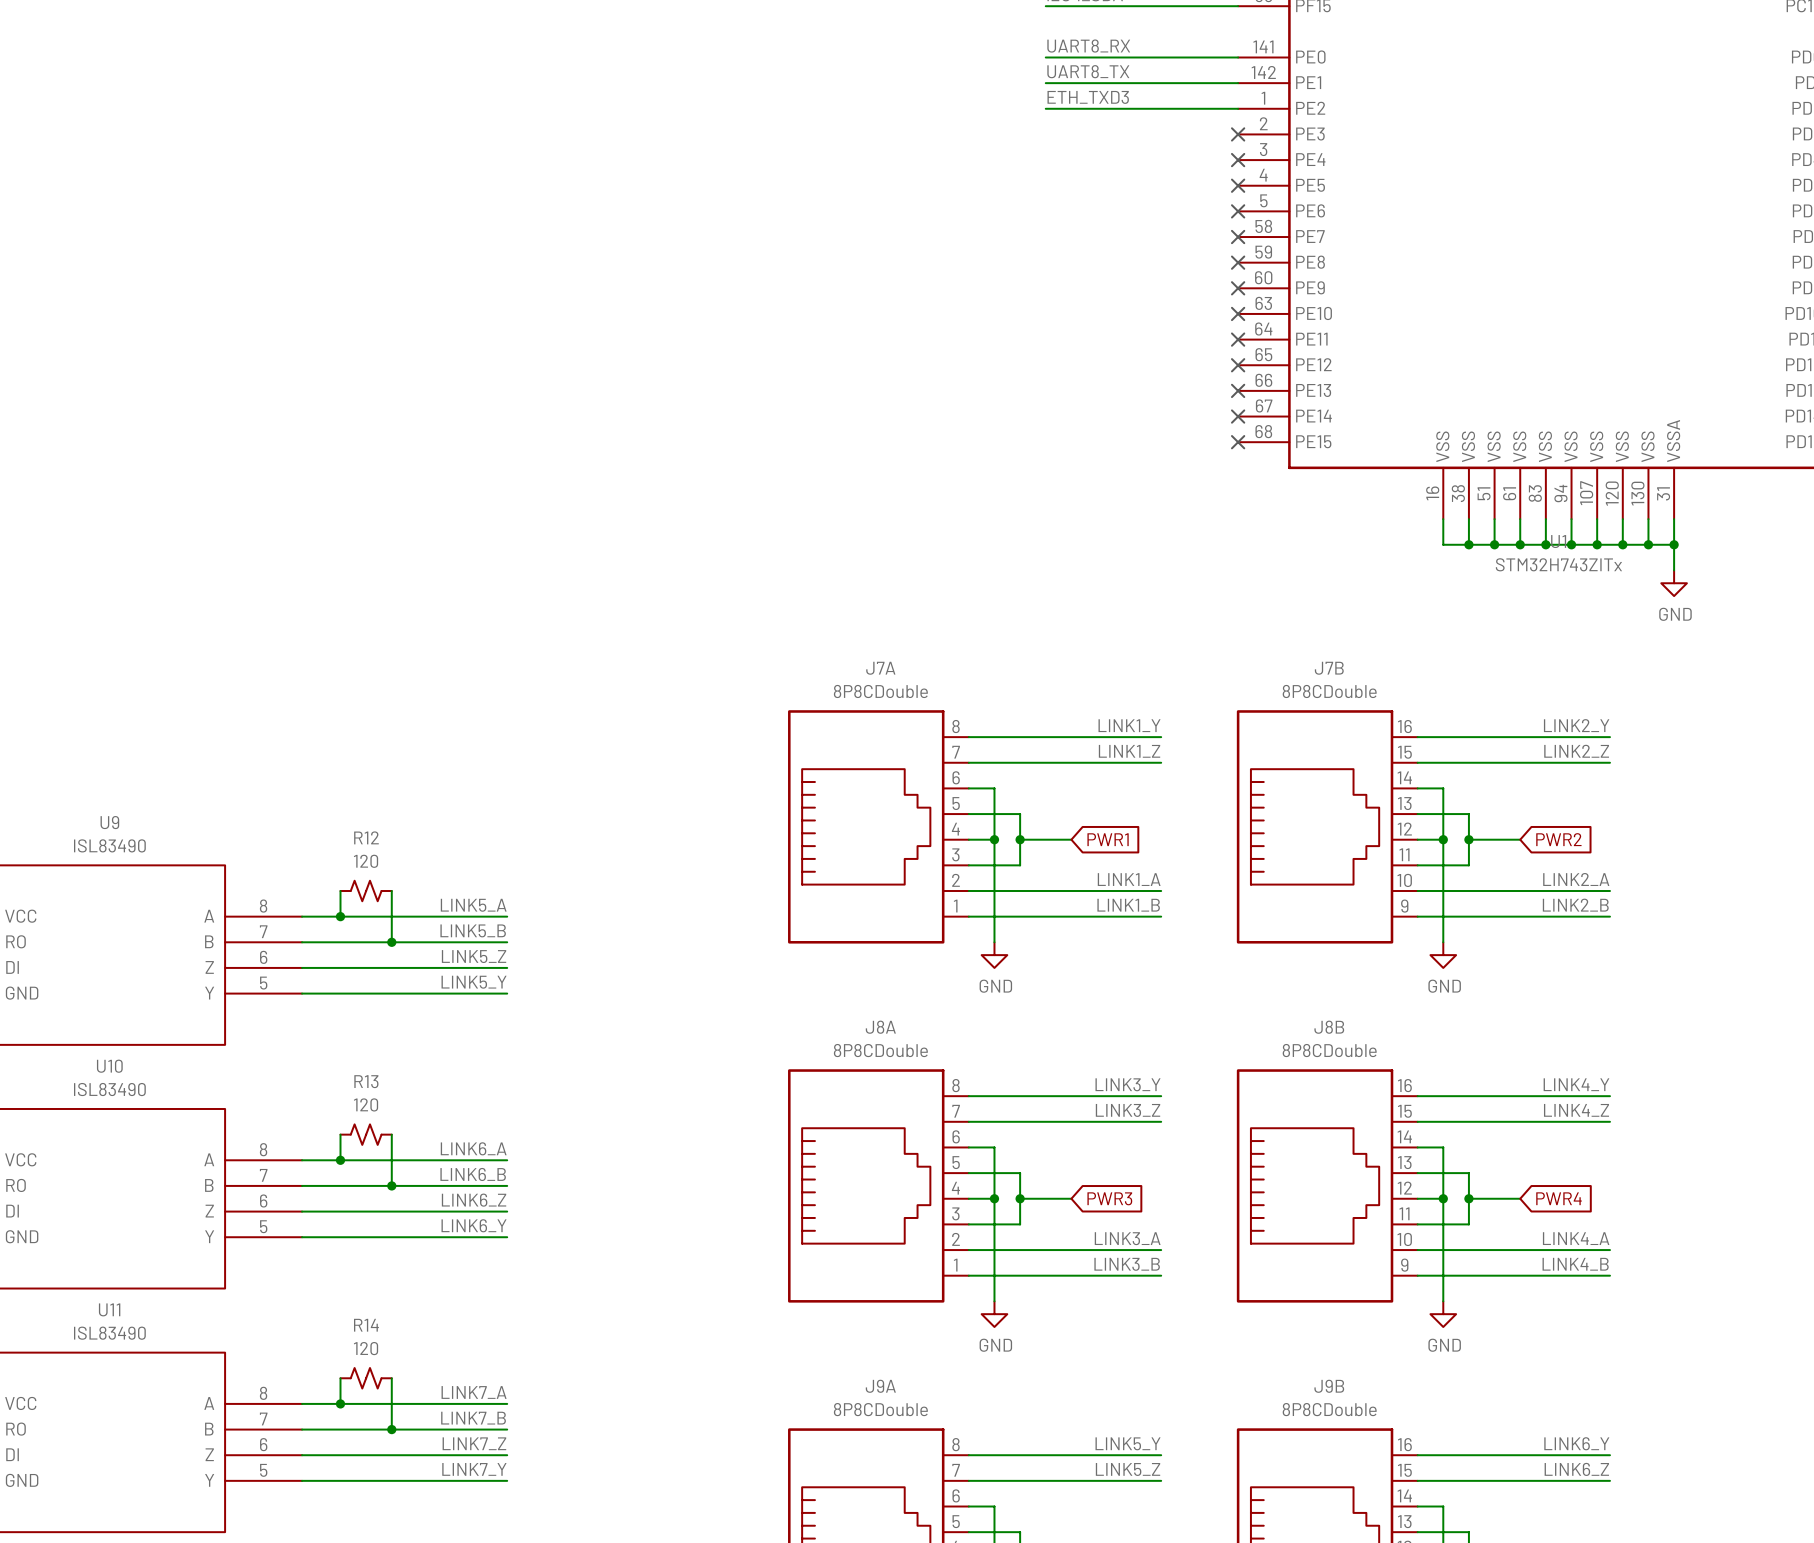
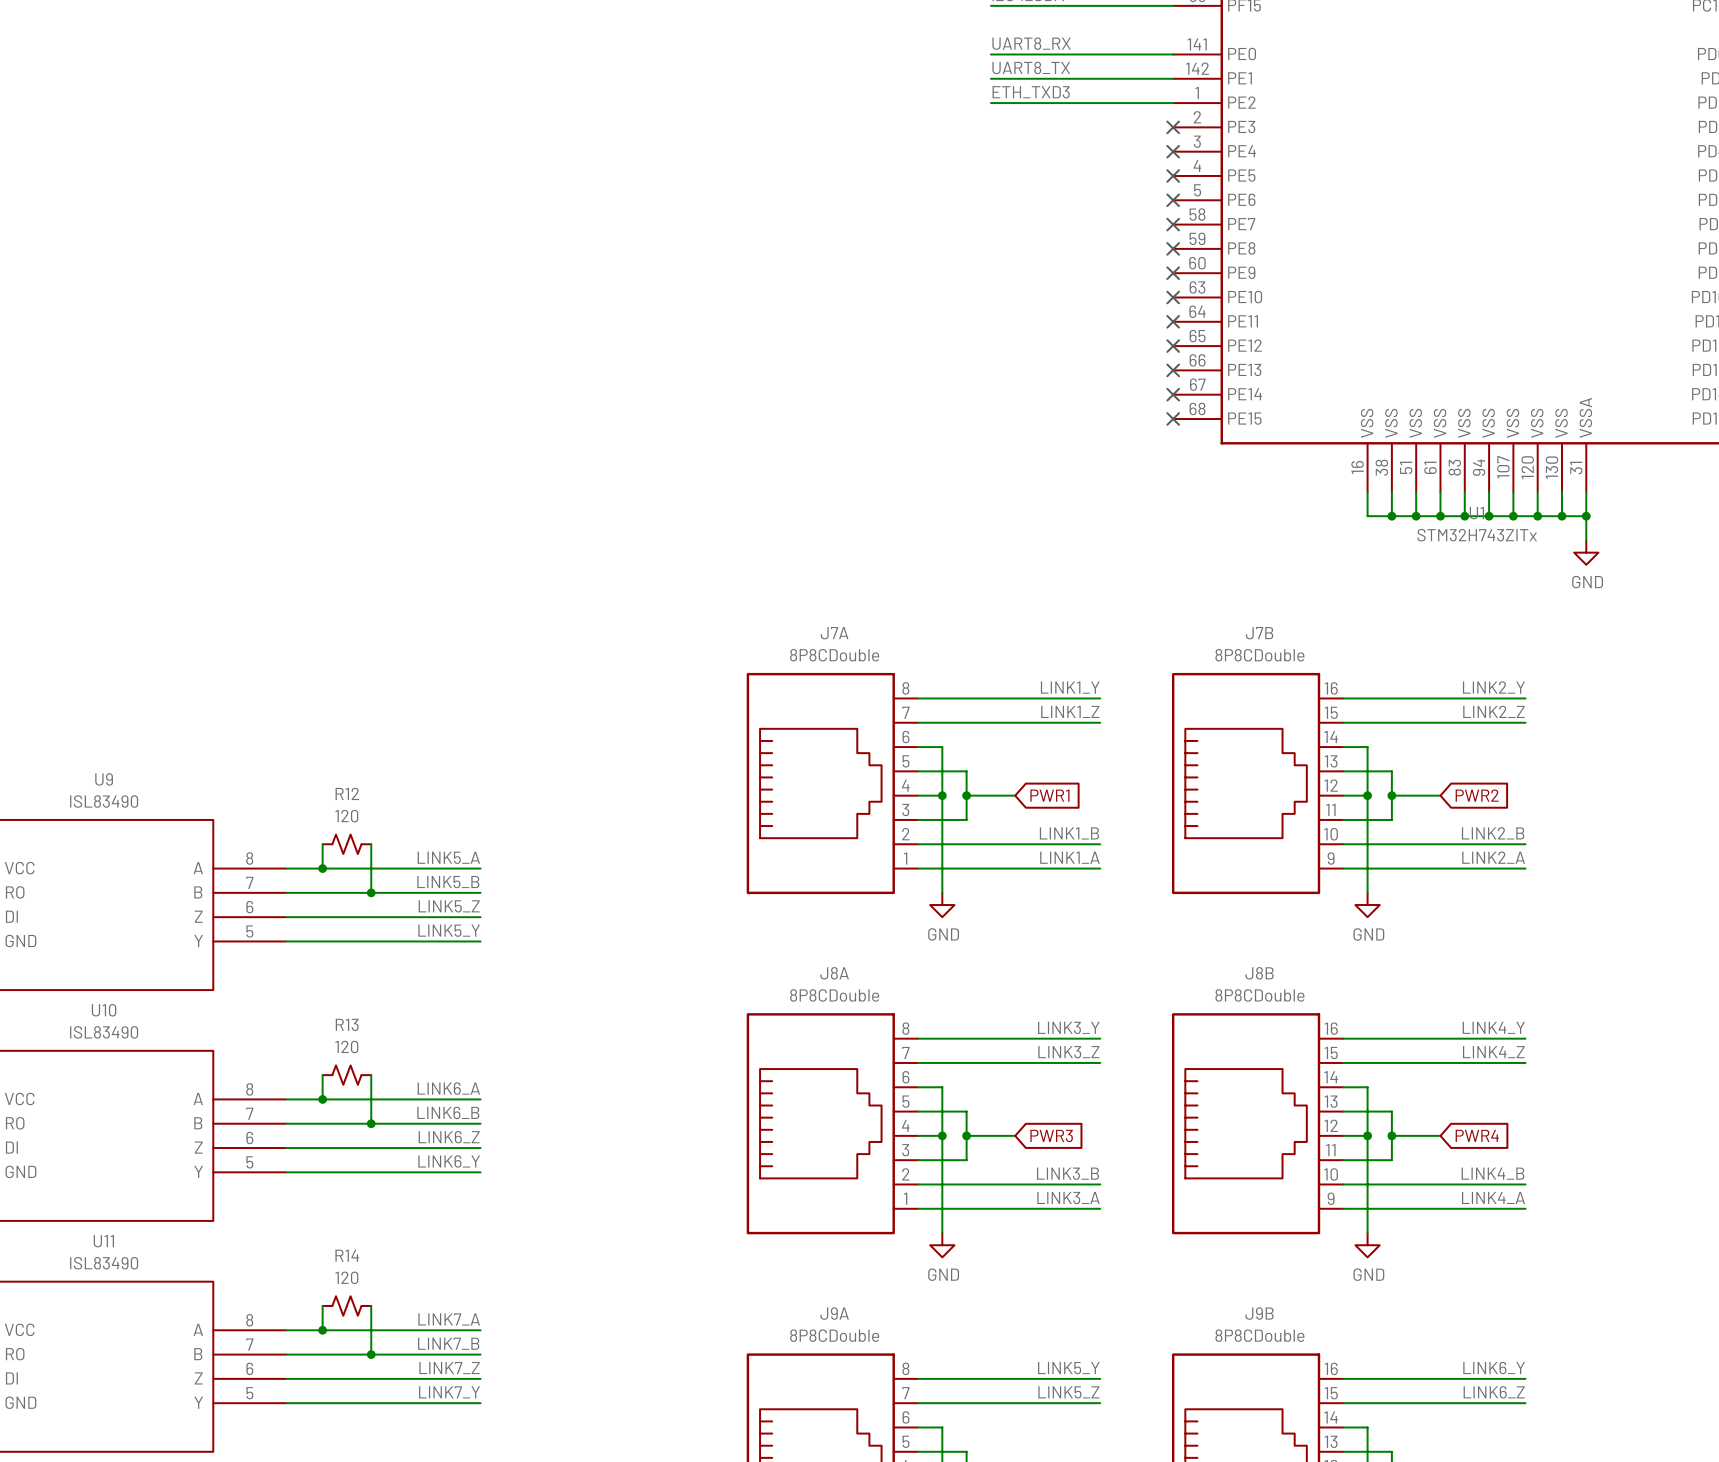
label: LINK1_A (1129, 879) -> LINK1_B (1069, 833)
label: LINK2_A (1576, 879) -> LINK2_B (1493, 833)
label: LINK1_B (1128, 905) -> LINK1_A (1069, 857)
label: LINK2_B (1575, 905) -> LINK2_A (1493, 857)
label: LINK3_A (1127, 1238) -> LINK3_B (1068, 1173)
label: LINK4_A (1576, 1238) -> LINK4_B (1492, 1173)
label: LINK3_B (1127, 1264) -> LINK3_A (1068, 1198)
label: LINK4_B (1575, 1264) -> LINK4_A (1493, 1197)

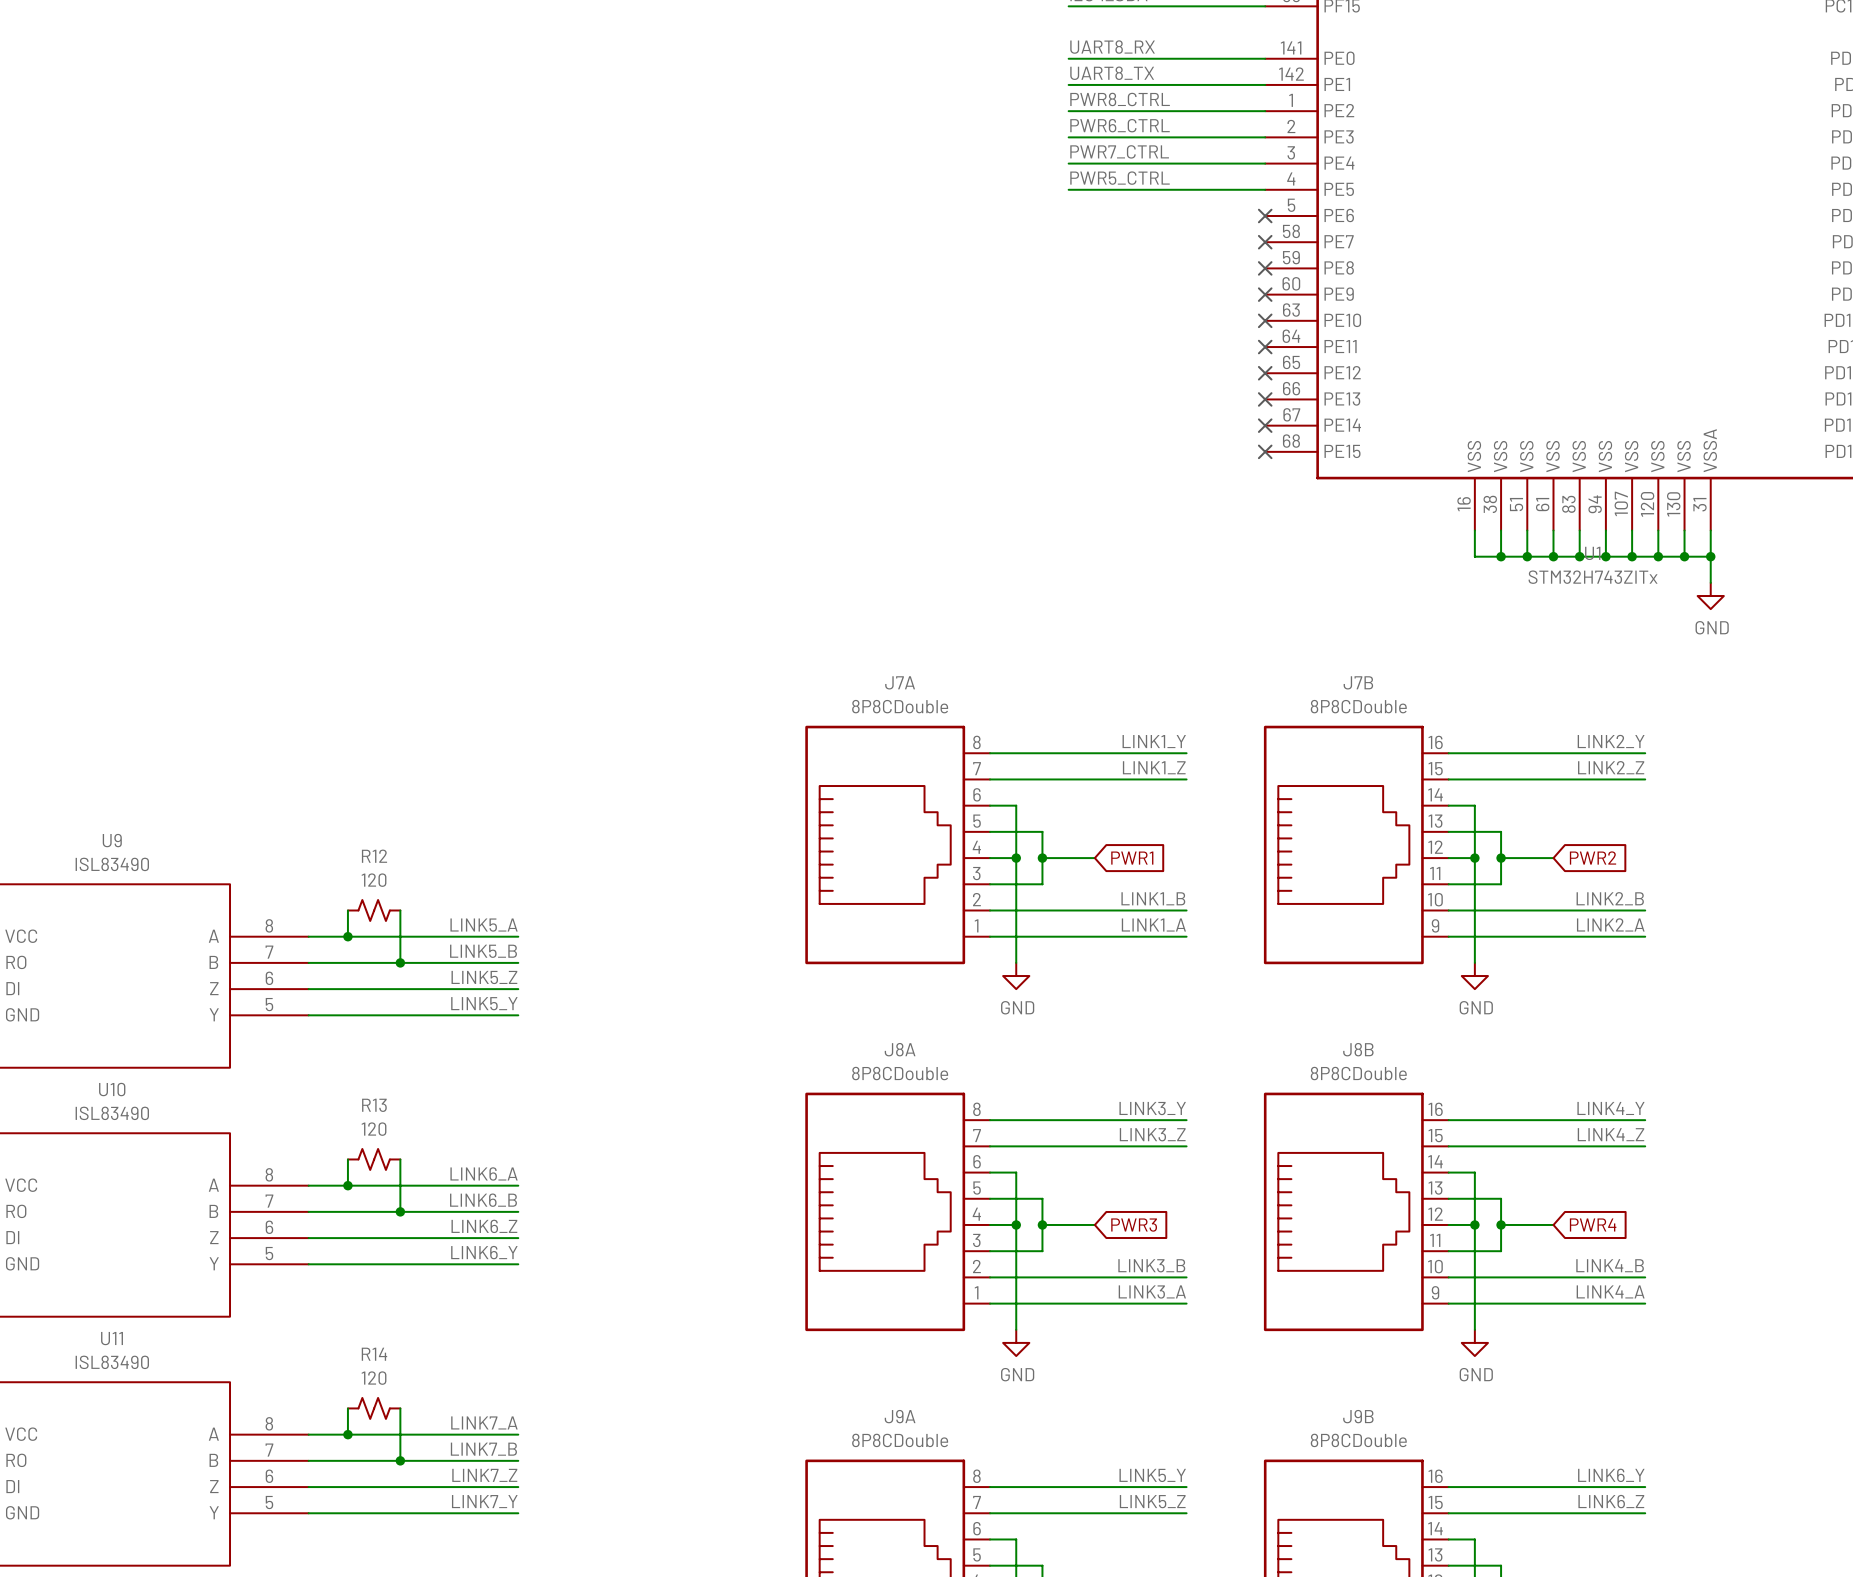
label: ETH_TXD3 (1031, 92) -> PWR8_CTRL (1120, 99)
label: none -> PWR6_CTRL (1120, 125)
wire: none -> (1068, 137) (1265, 137)
no-connect mark: (1173, 127) -> none
label: none -> PWR7_CTRL (1119, 151)
wire: none -> (1068, 163) (1265, 163)
no-connect mark: (1173, 151) -> none
label: none -> PWR5_CTRL (1120, 178)
wire: none -> (1068, 189) (1265, 189)
no-connect mark: (1173, 175) -> none

